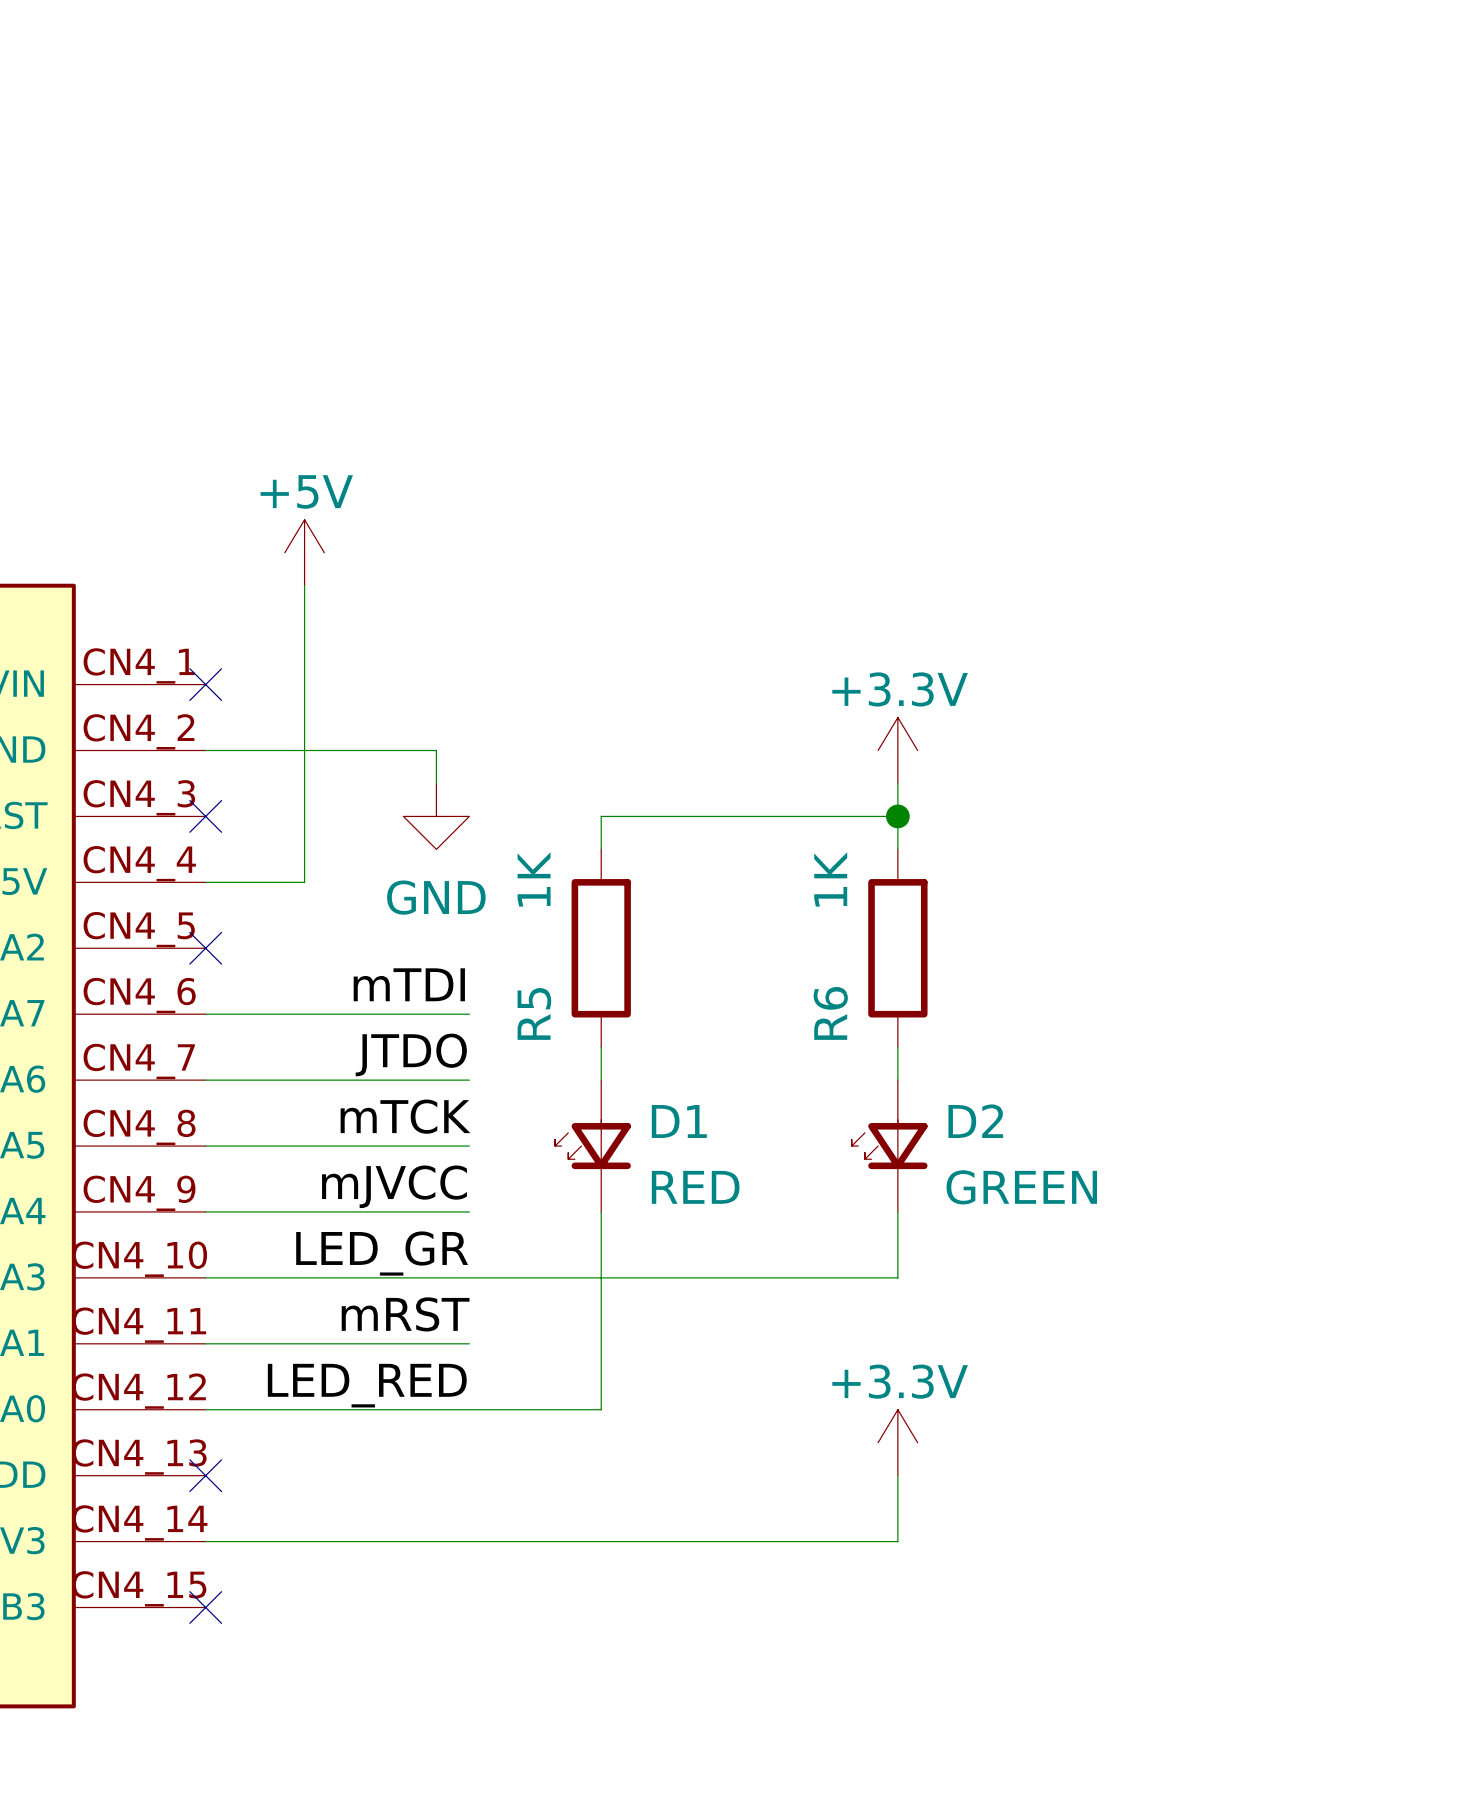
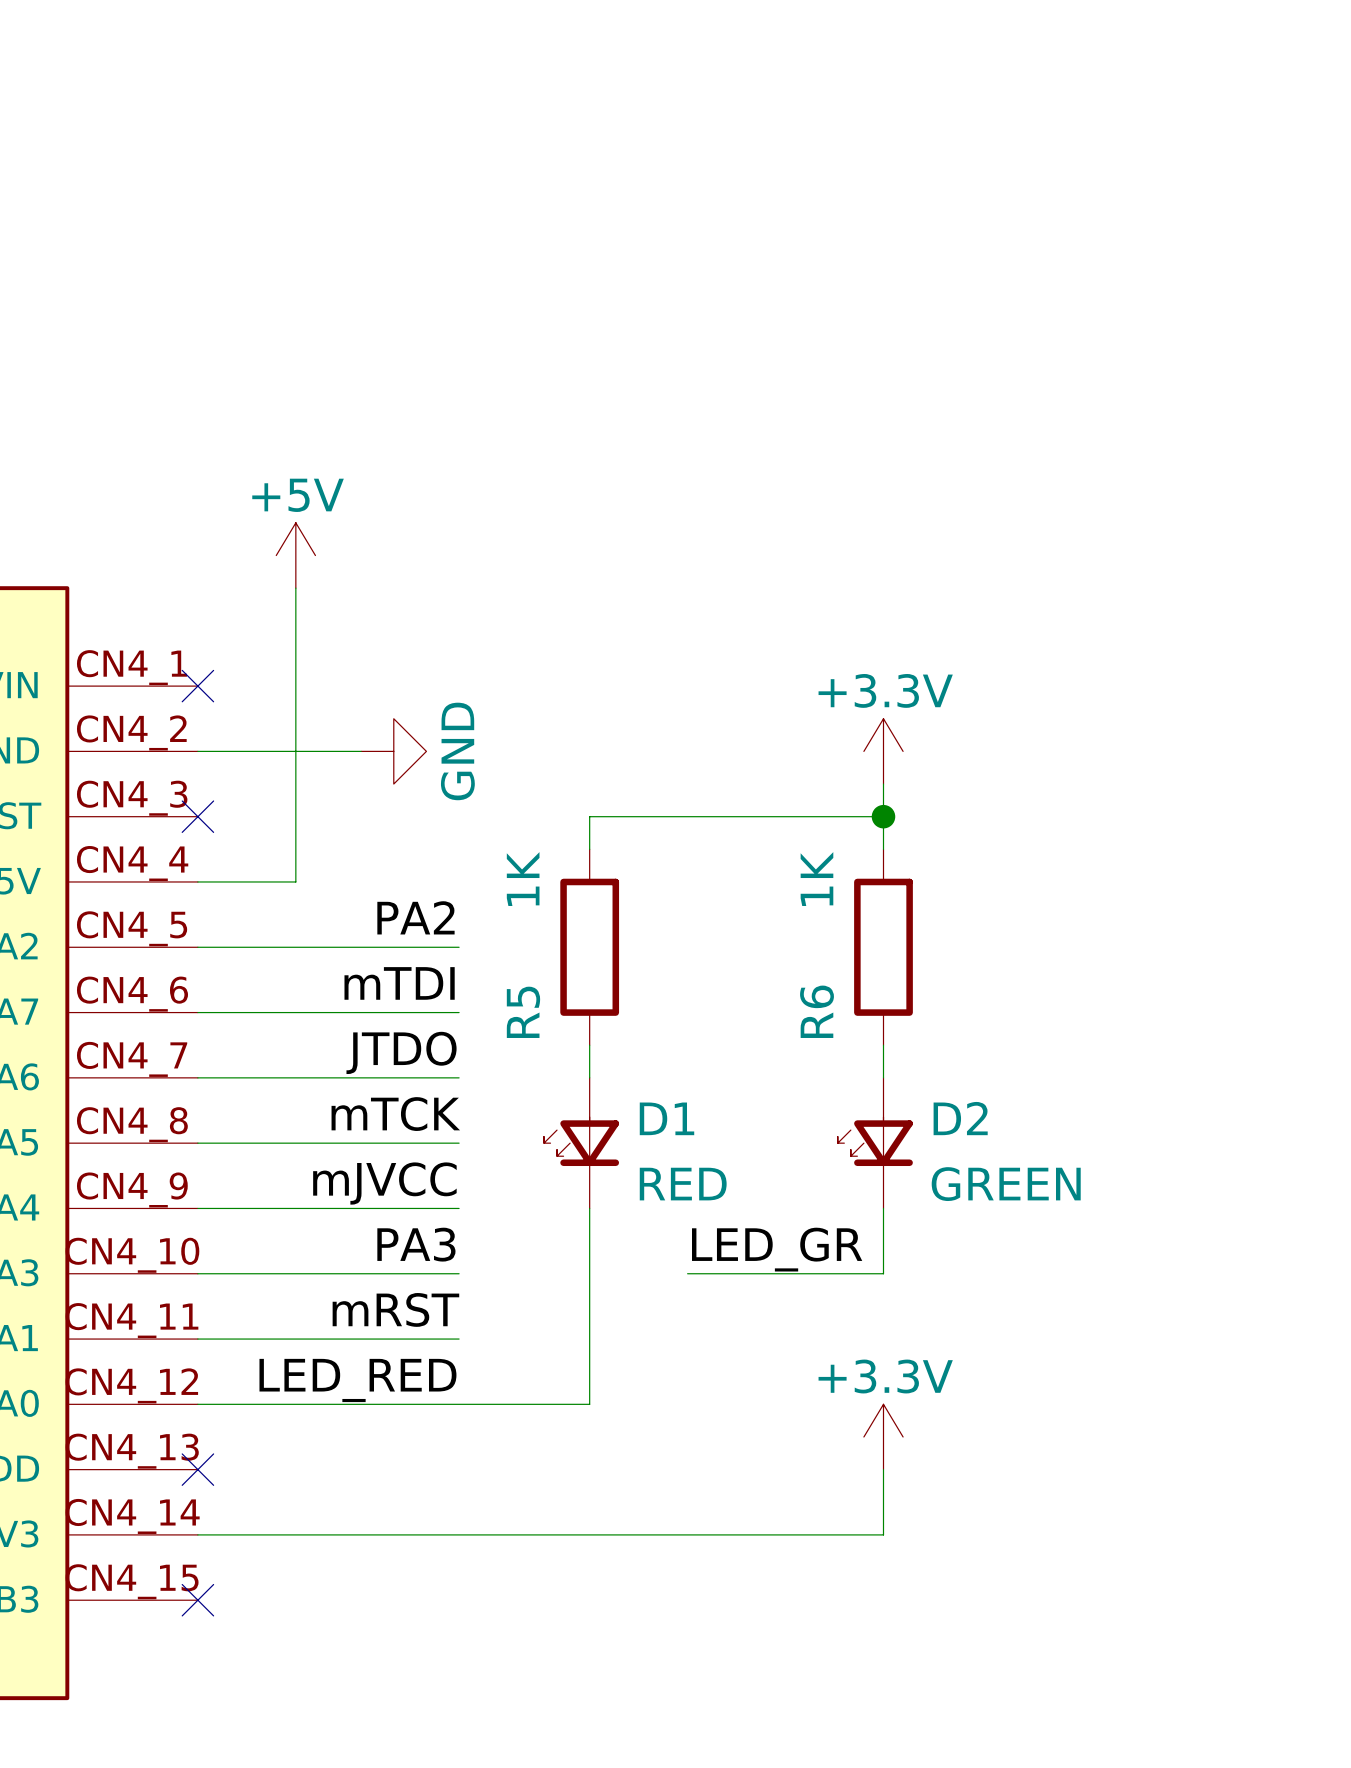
wire: (370, 750) (436, 750) (436, 783) -> none
power symbol rotation: 0° (436, 816) -> 90° counterclockwise (393, 751)
power symbol position: GND (436, 816) -> GND (393, 751)
label: none -> PA2 (415, 917)
wire: none -> (197, 947) (459, 947)
no-connect mark: (205, 948) -> none
label: LED_GR (382, 1253) -> PA3 (416, 1244)
label: none -> LED_GR (777, 1249)
wire: (469, 1277) (700, 1277) -> none

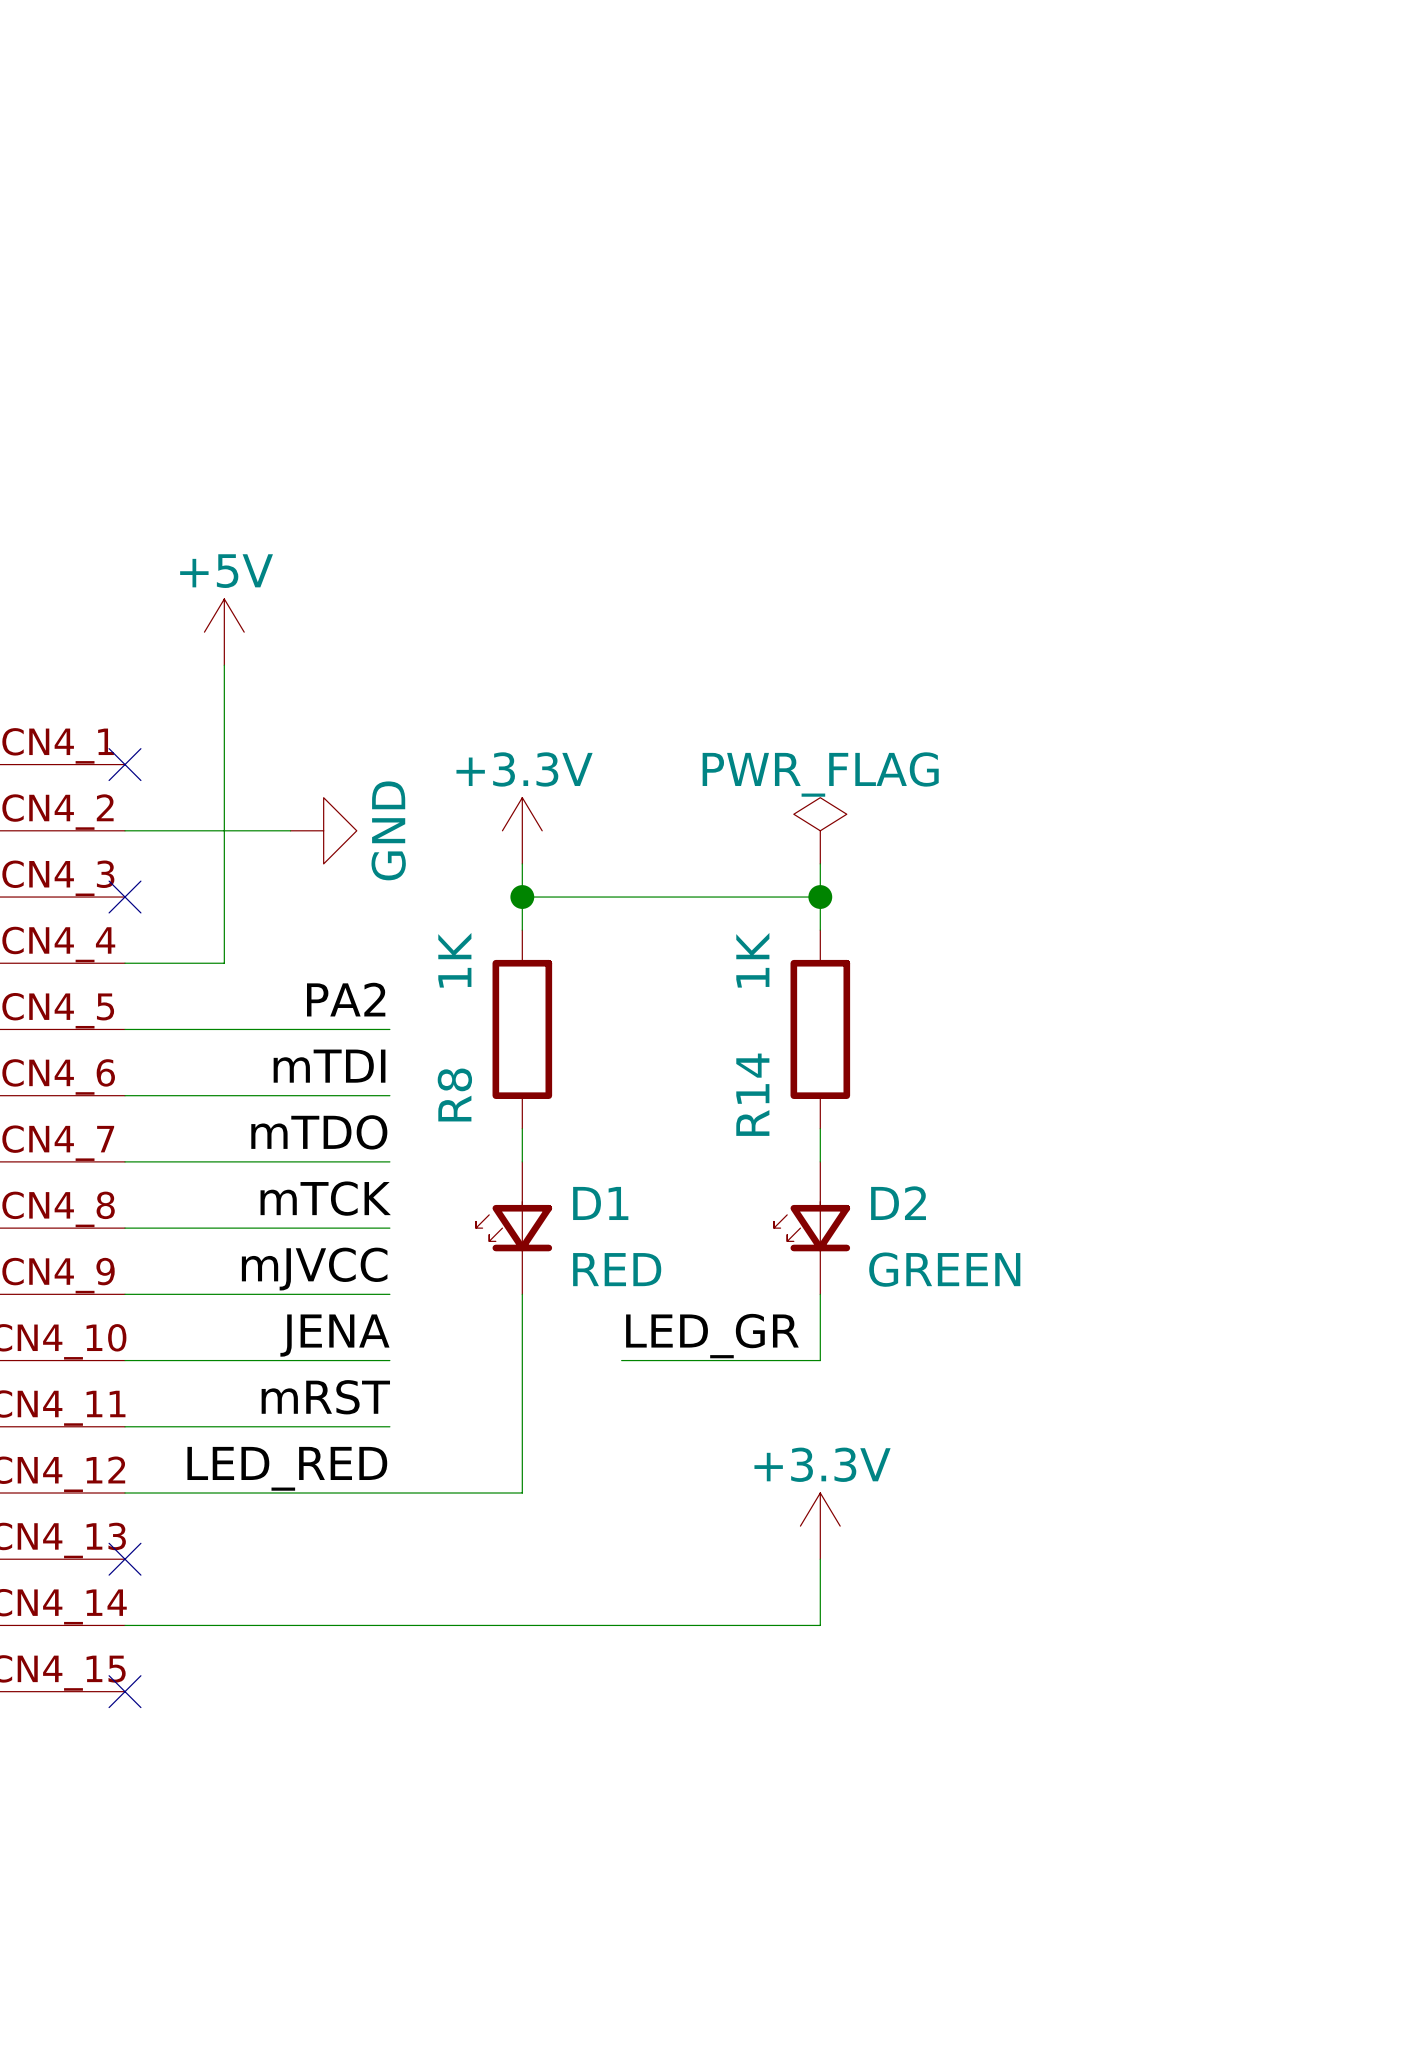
power symbol: none -> +3.3V (522, 830)
power symbol: +3.3V (883, 751) -> PWR_FLAG (820, 830)
wire: none -> (522, 863) (522, 897)
junction: none -> (522, 897)
R6 name: R6 (817, 1011) -> R14 (752, 1094)
R5 name: R5 (523, 1012) -> R8 (454, 1095)
label: JTDO (401, 1052) -> mTDO (319, 1132)
label: PA3 (416, 1244) -> JENA (334, 1335)

